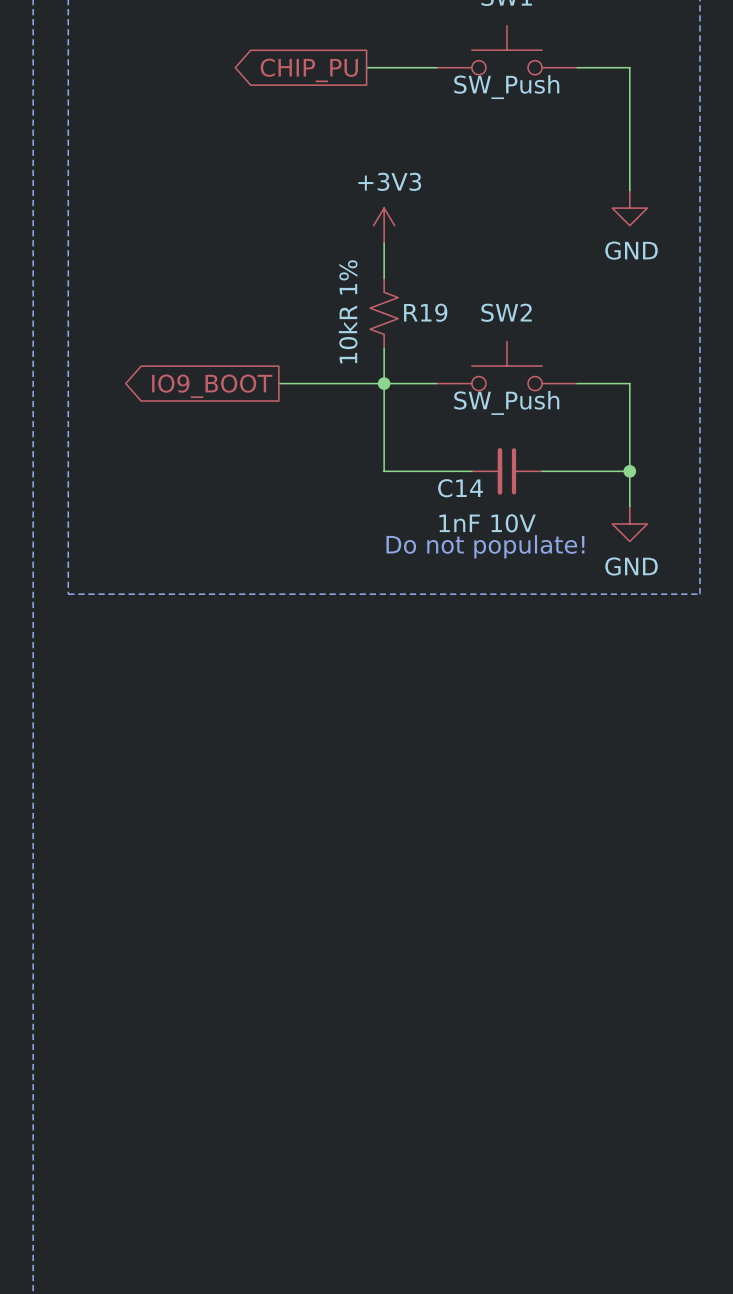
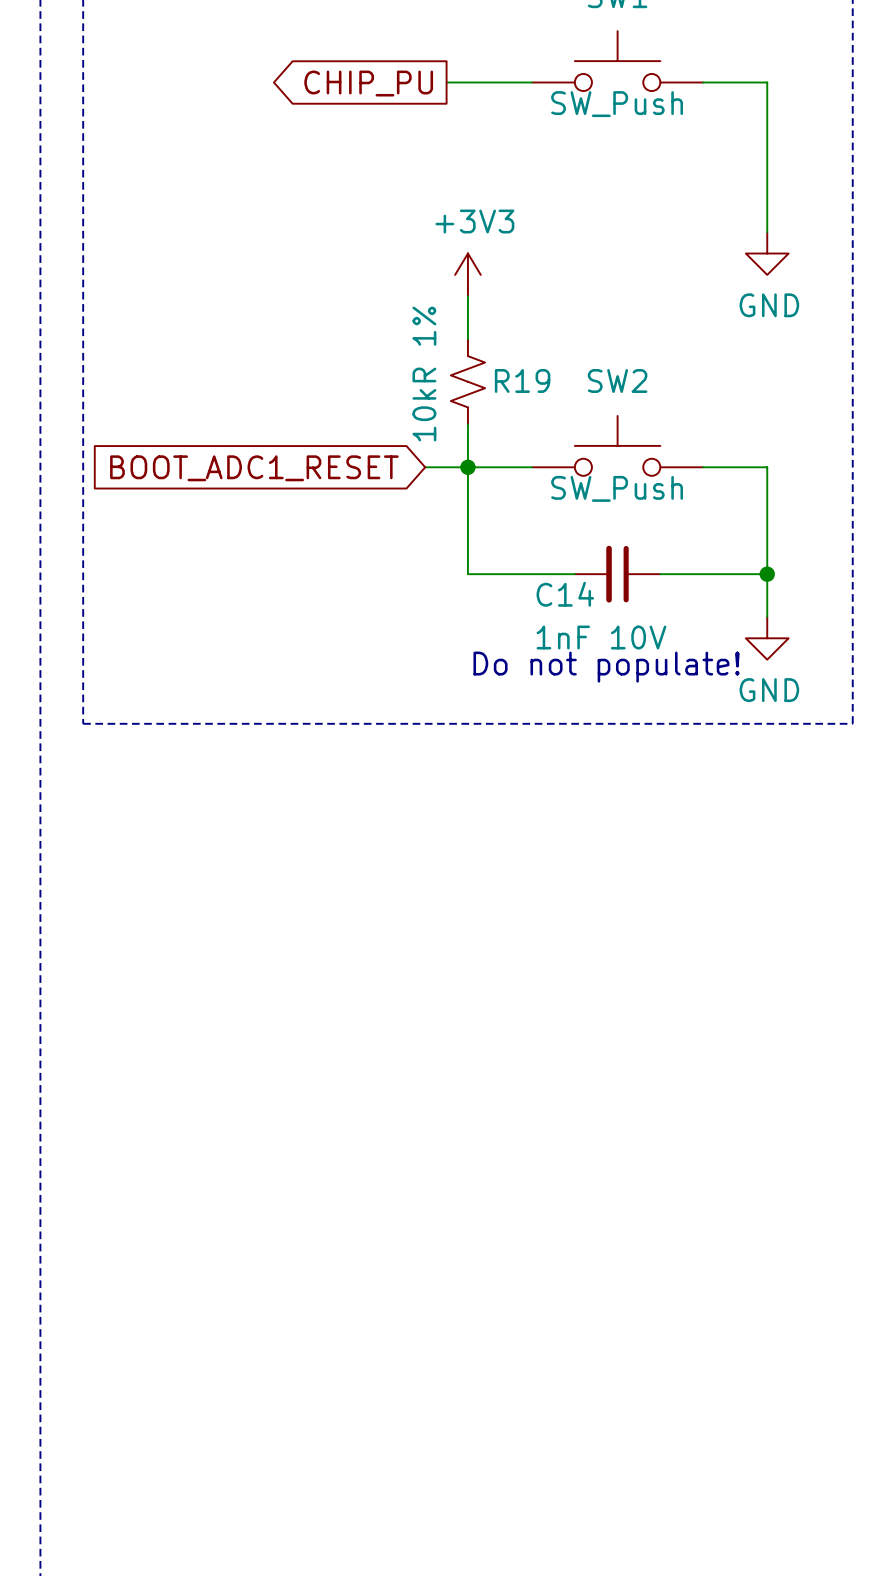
wire: (278, 383) (349, 383) -> none
global label: none -> BOOT_ADC1_RESET (254, 468)
global label: IO9_BOOT (212, 386) -> none

